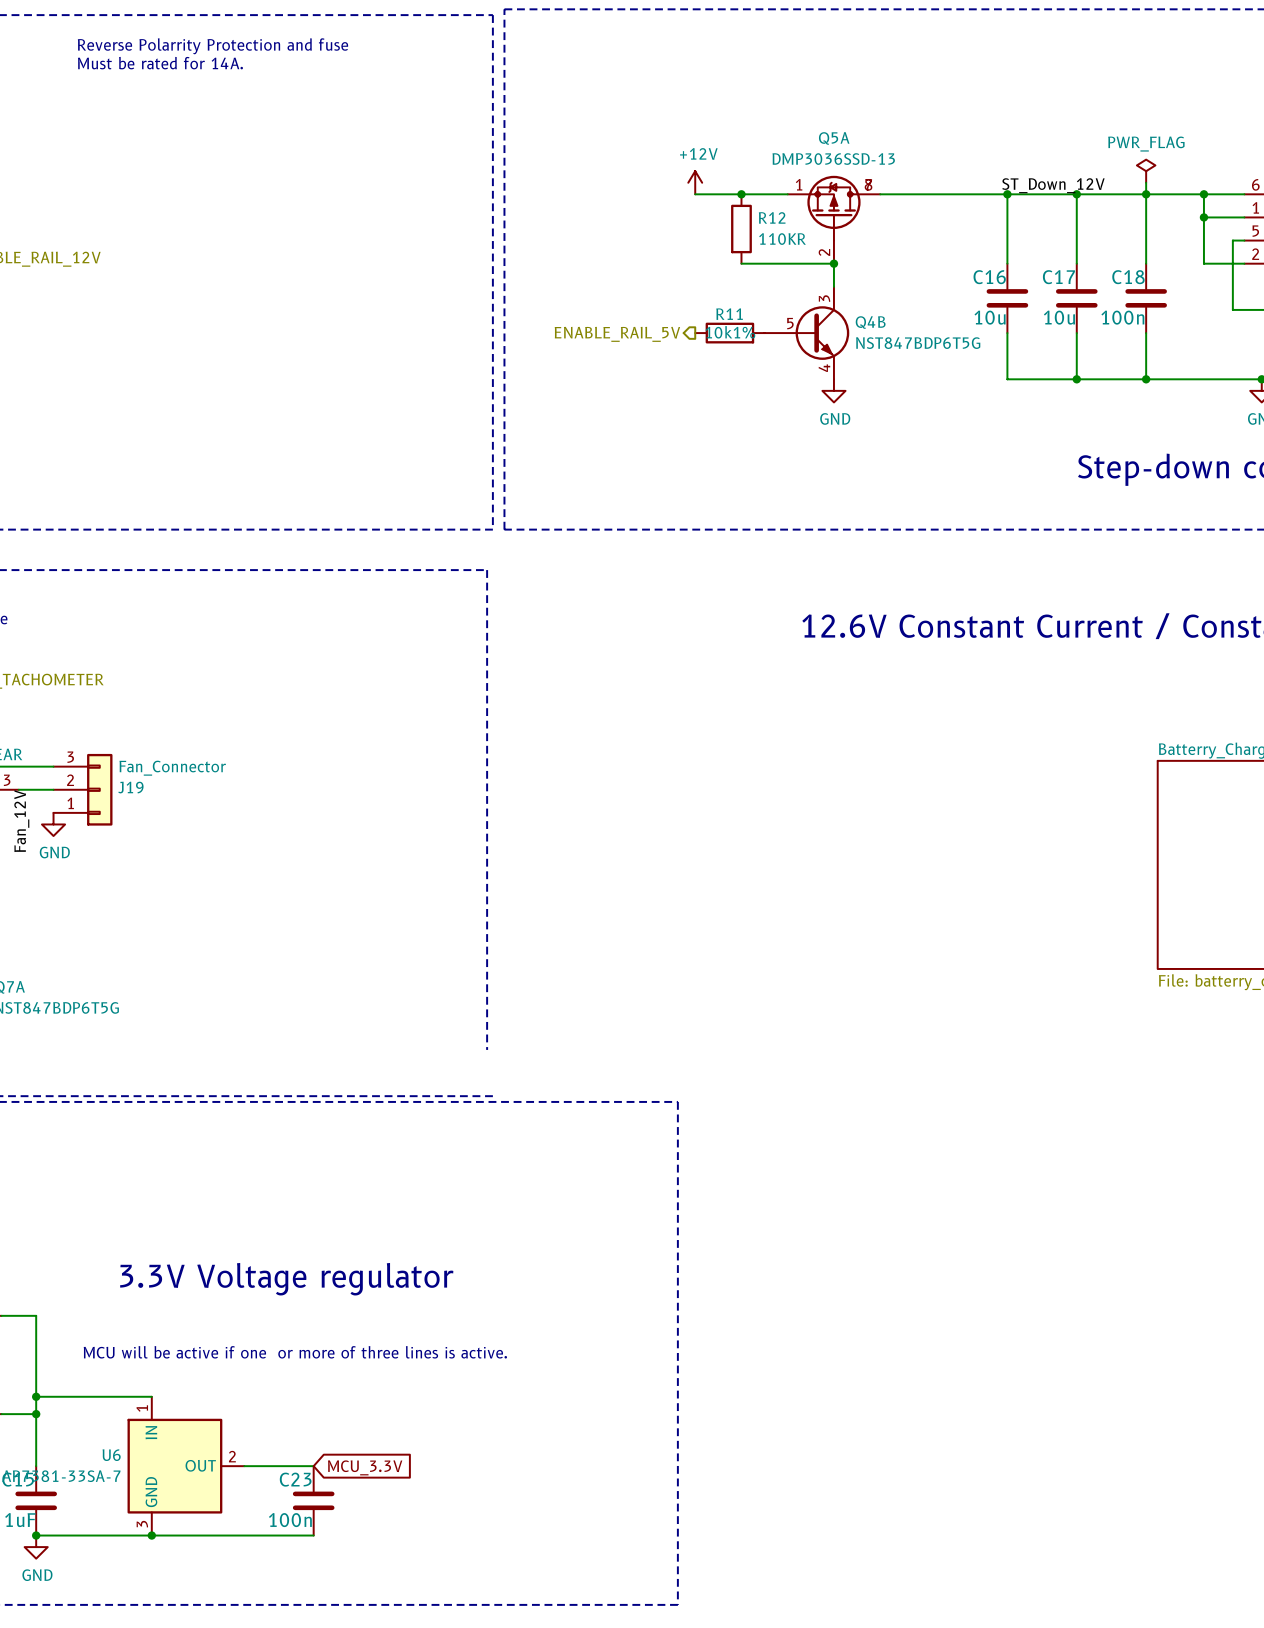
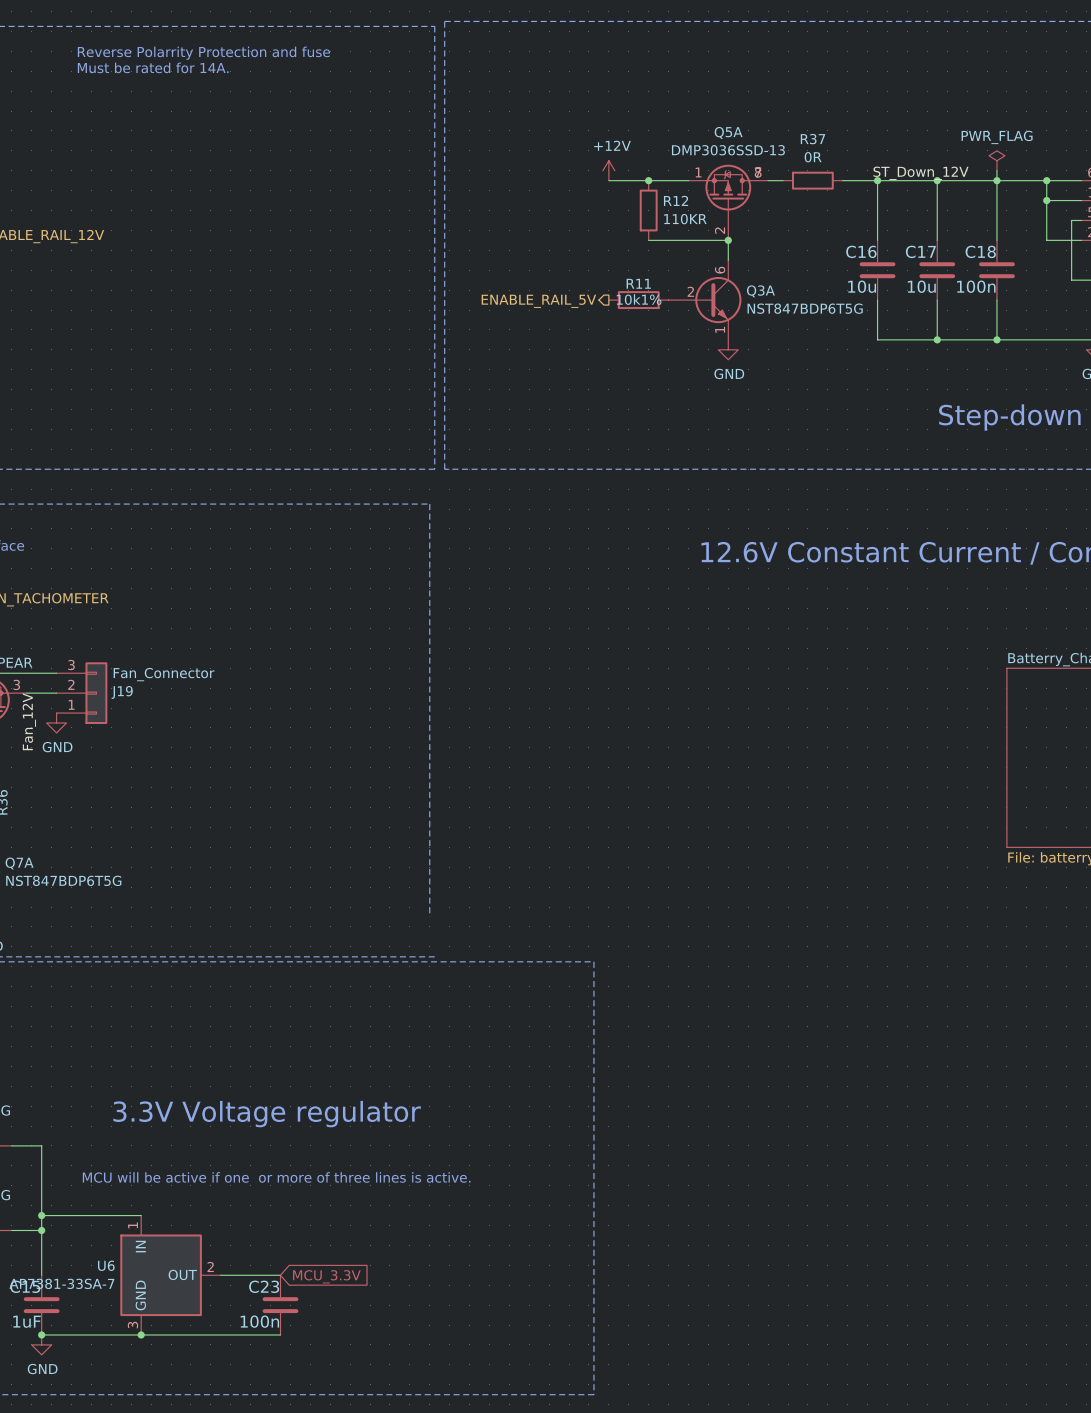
wire: (897, 194) (966, 194) -> none
R37: none -> 0R (812, 180)
Q4B pin number: 3 (824, 298) -> 6 (720, 270)
Q4B name: Q4B (870, 322) -> Q3A (760, 291)
Q4B pin number: 5 (790, 323) -> 2 (690, 291)
Q4B pin number: 4 (824, 368) -> 1 (720, 329)

